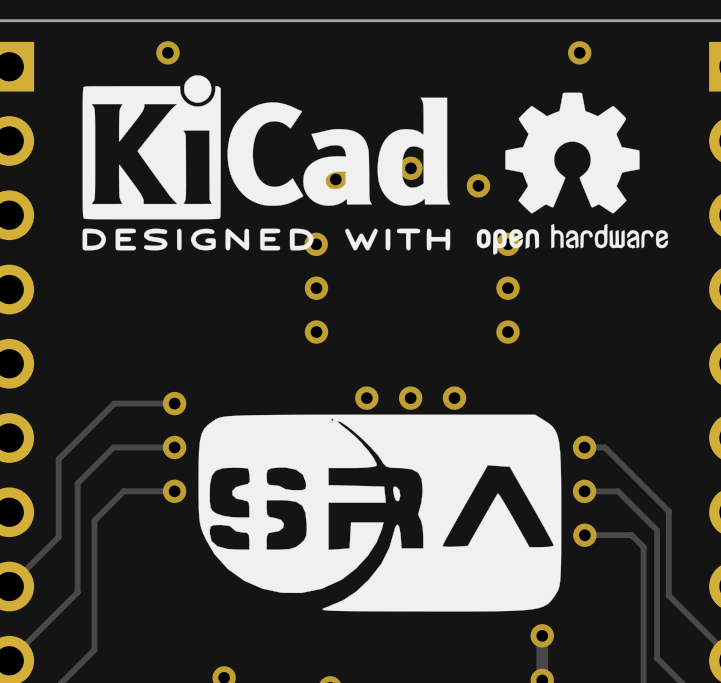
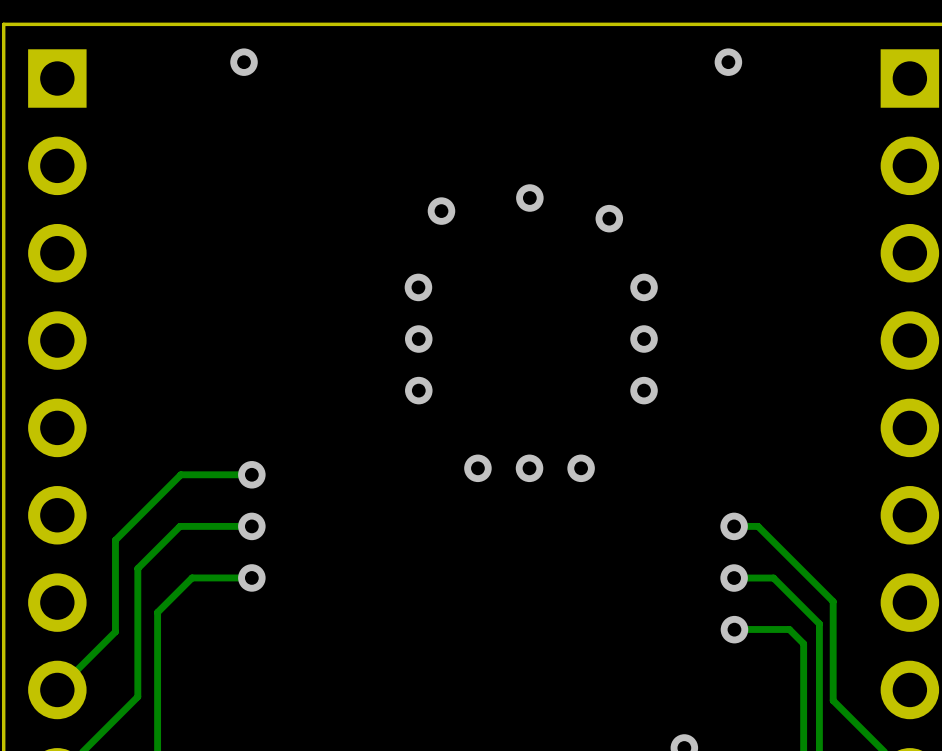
drawing: [82, 75, 669, 255] -> none
drawing: [198, 414, 562, 612] -> none

